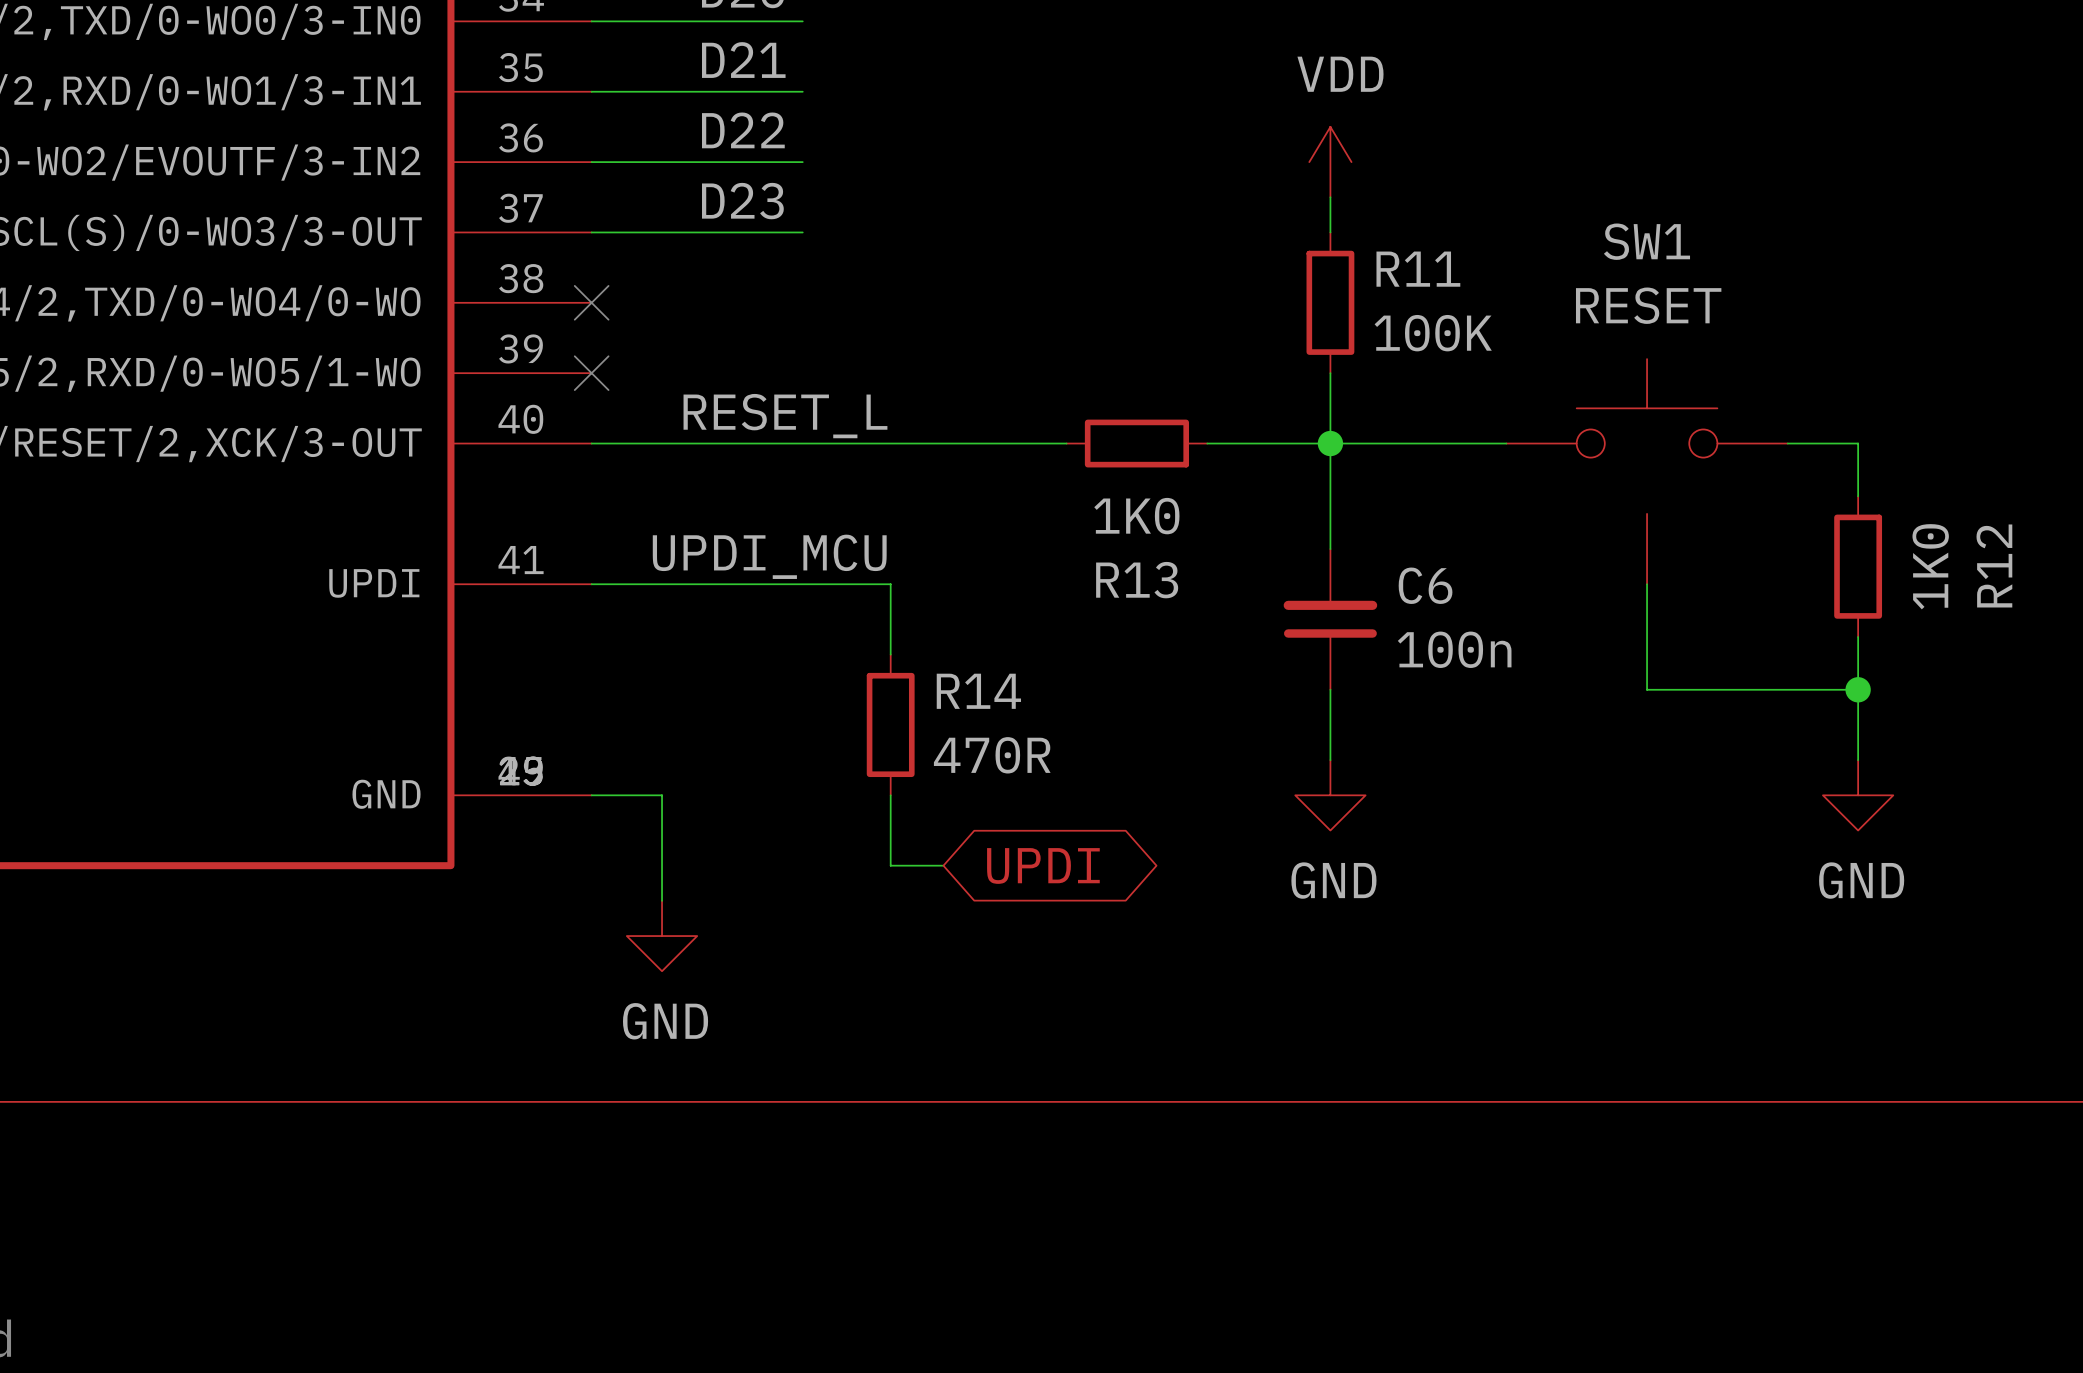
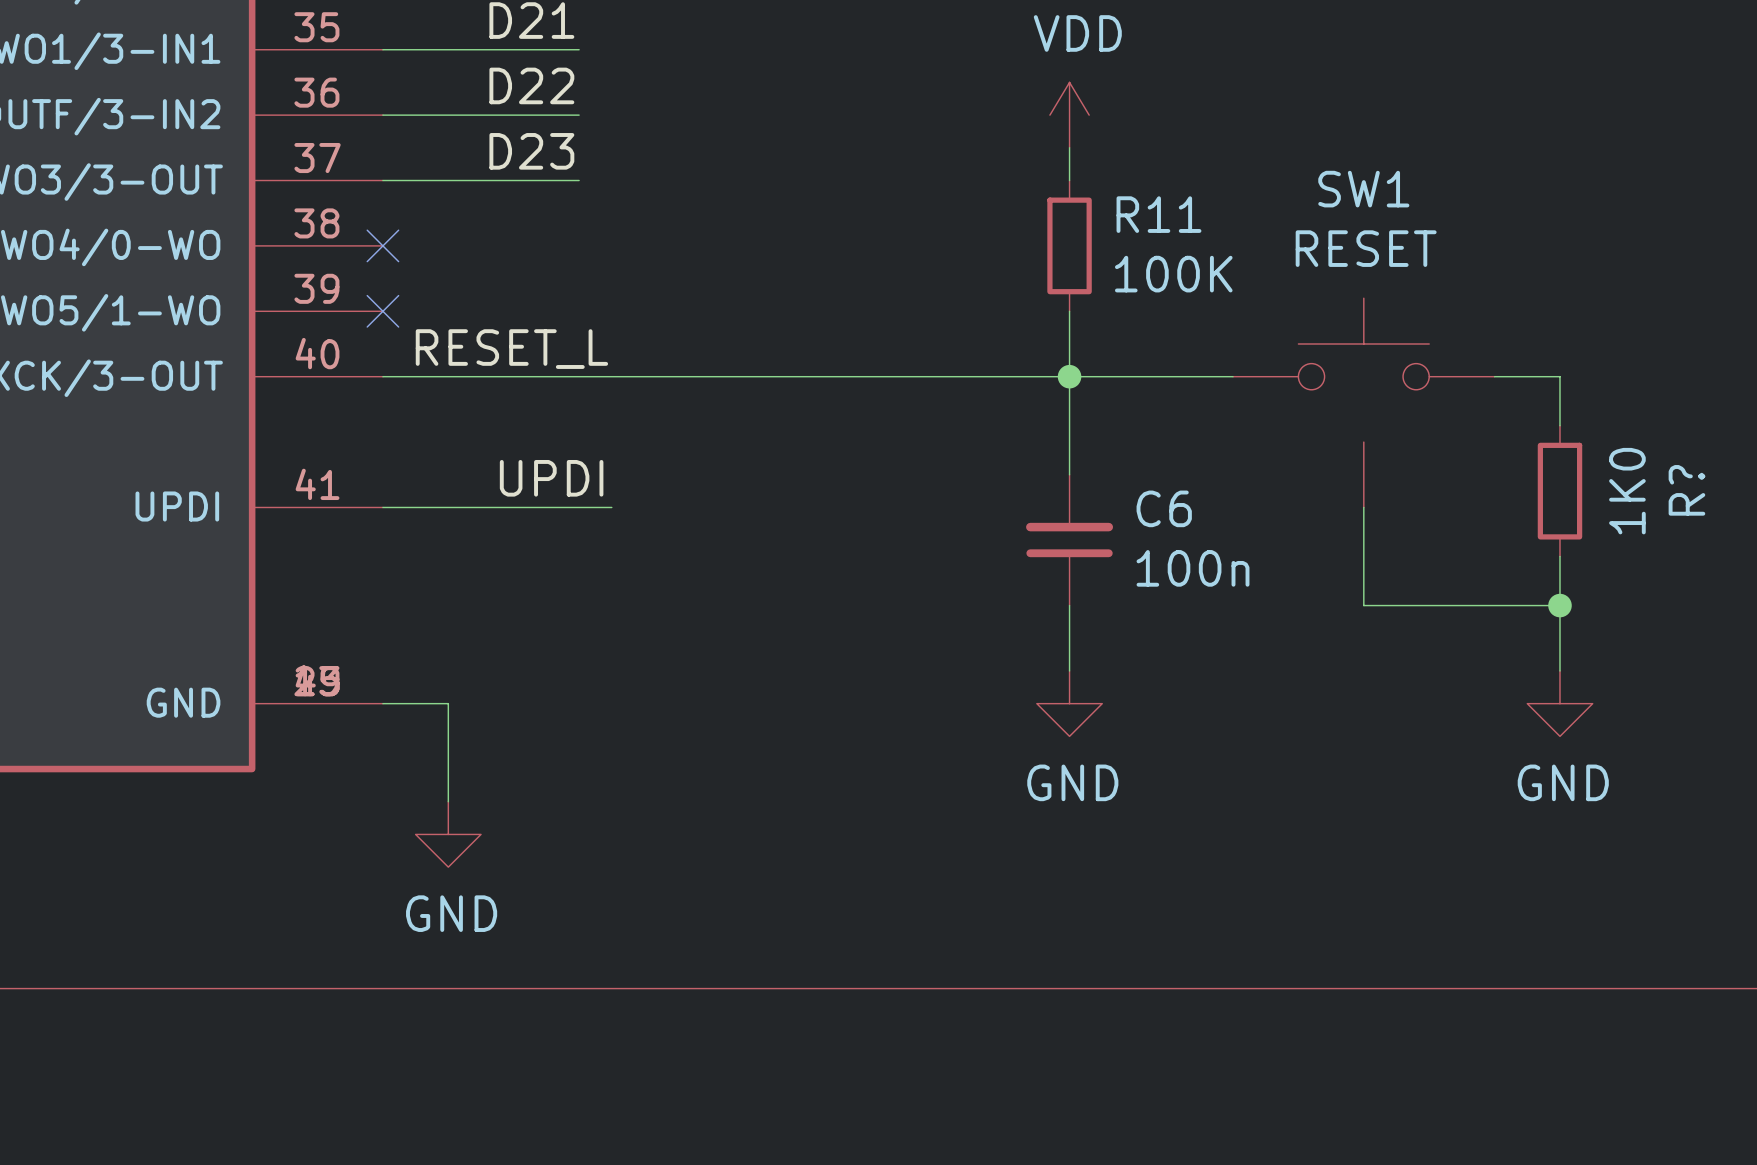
label position: RESET_L (785, 416) -> RESET_L (511, 349)
wire: none -> (824, 376) (955, 376)
R13: 1K0 (1136, 443) -> none
label: UPDI_MCU (769, 556) -> UPDI (551, 478)
R12 name: R12 (1994, 565) -> R? (1686, 490)
wire: (837, 584) (890, 584) (890, 654) -> none
R14: 470R (890, 724) -> none
wire: (890, 795) (890, 865) (943, 865) -> none
global label: UPDI (1043, 865) -> none

